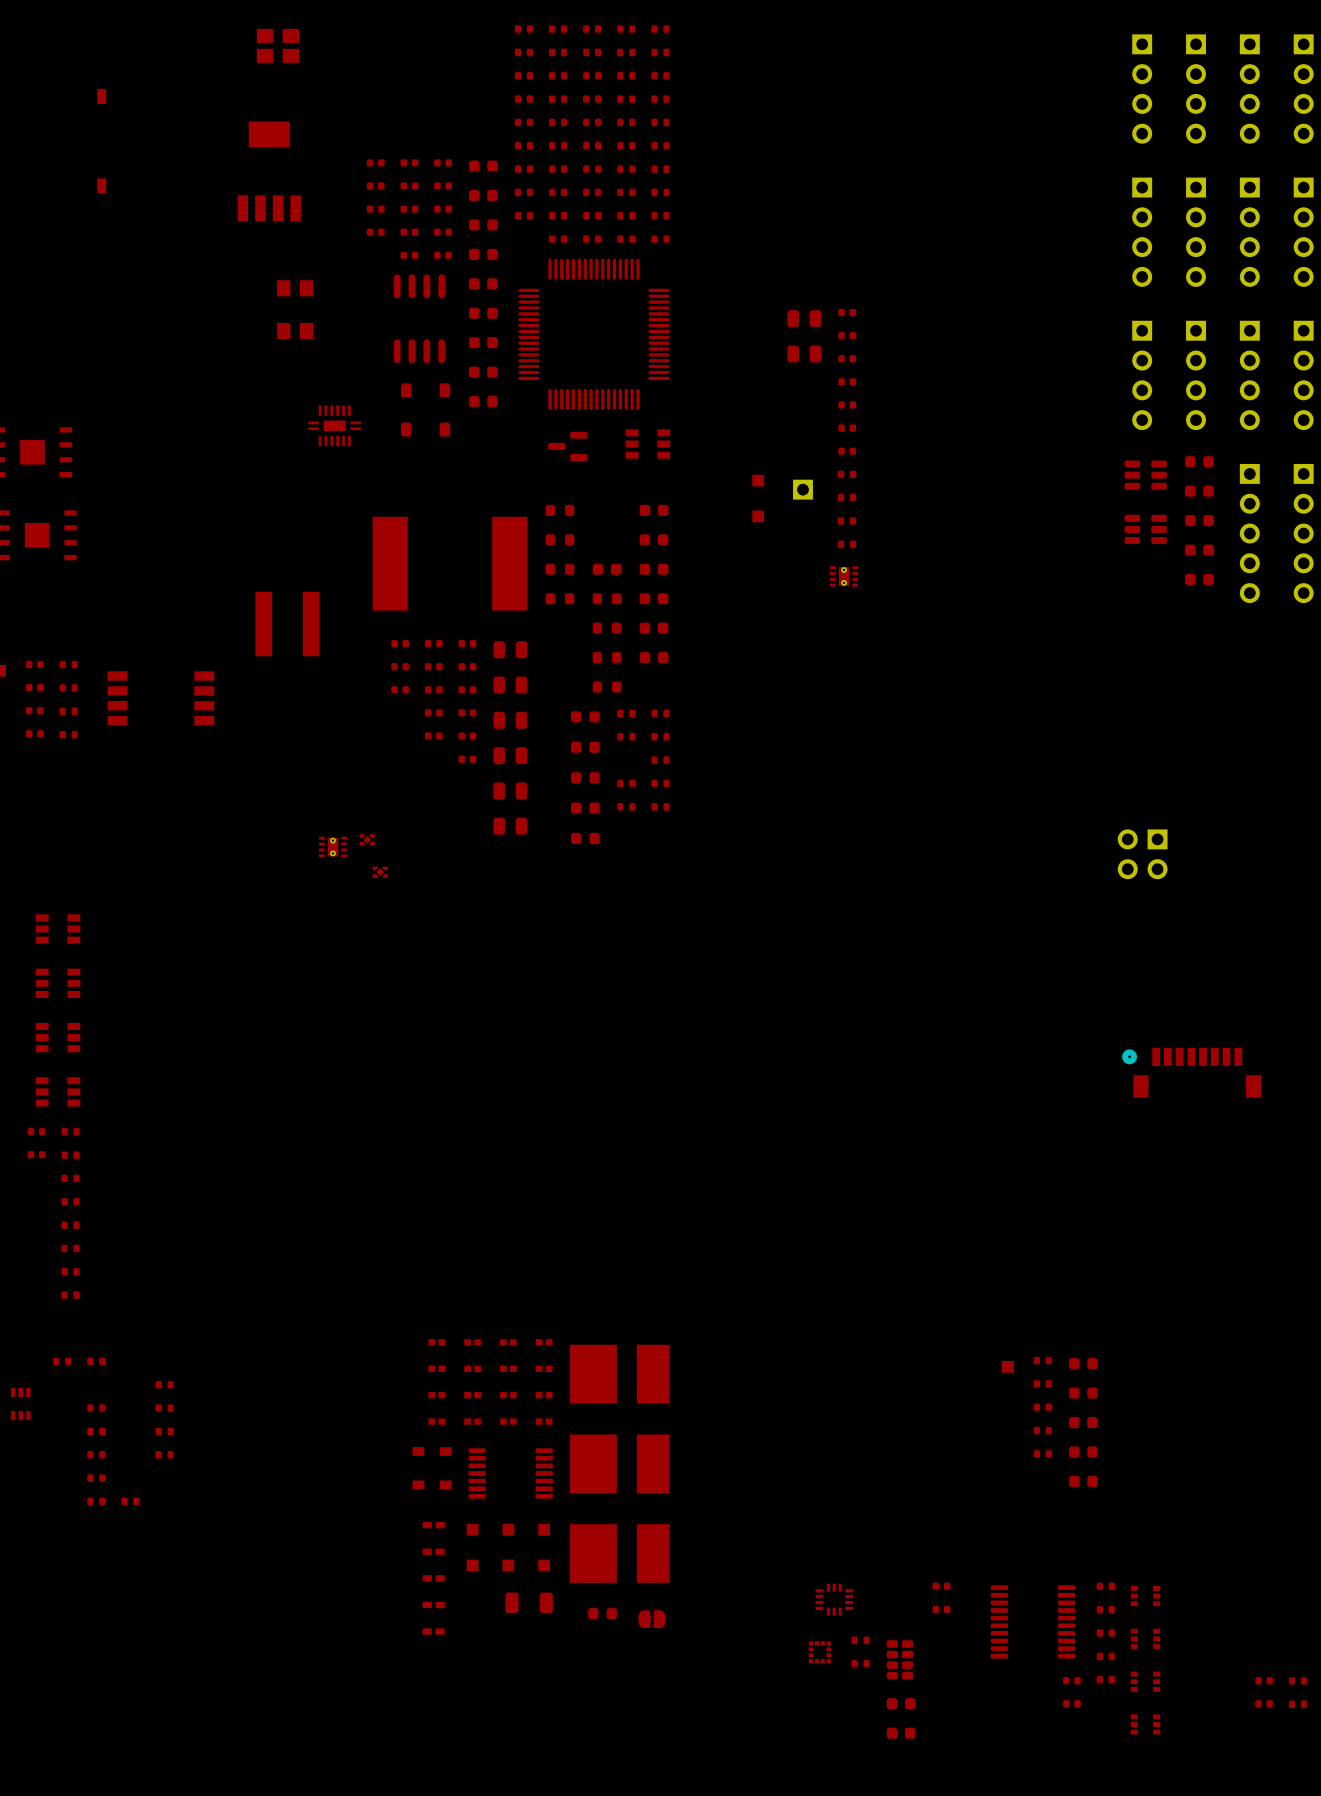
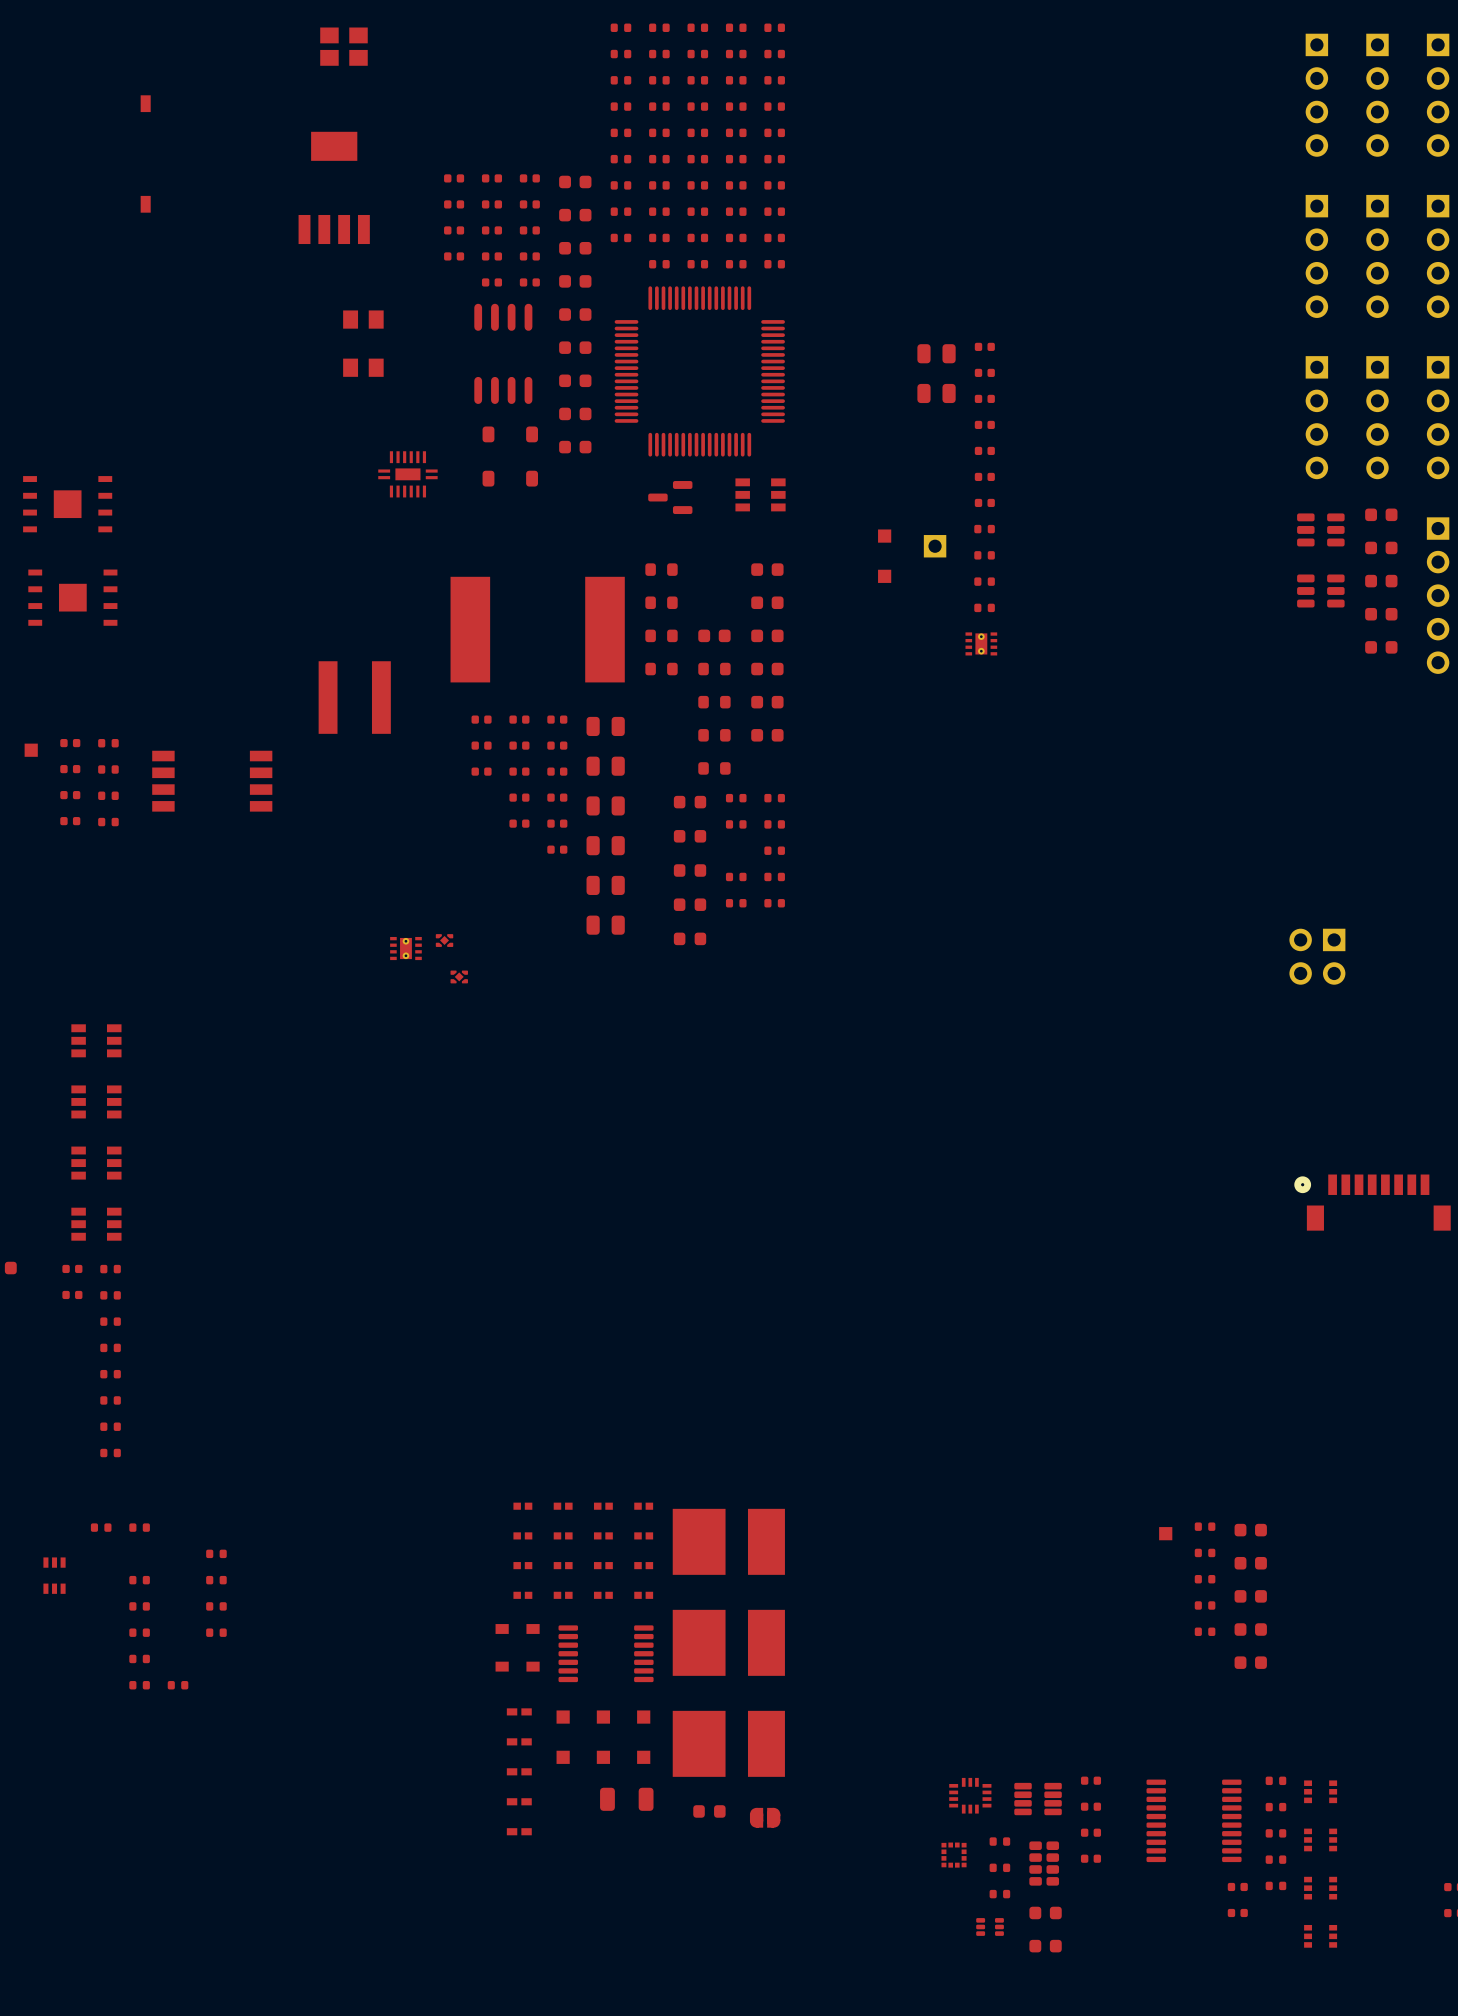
part: none -> (1038, 1799)
part: none -> (1090, 1832)
part: none -> (1090, 1858)
part: none -> (999, 1894)
part: none -> (990, 1926)

